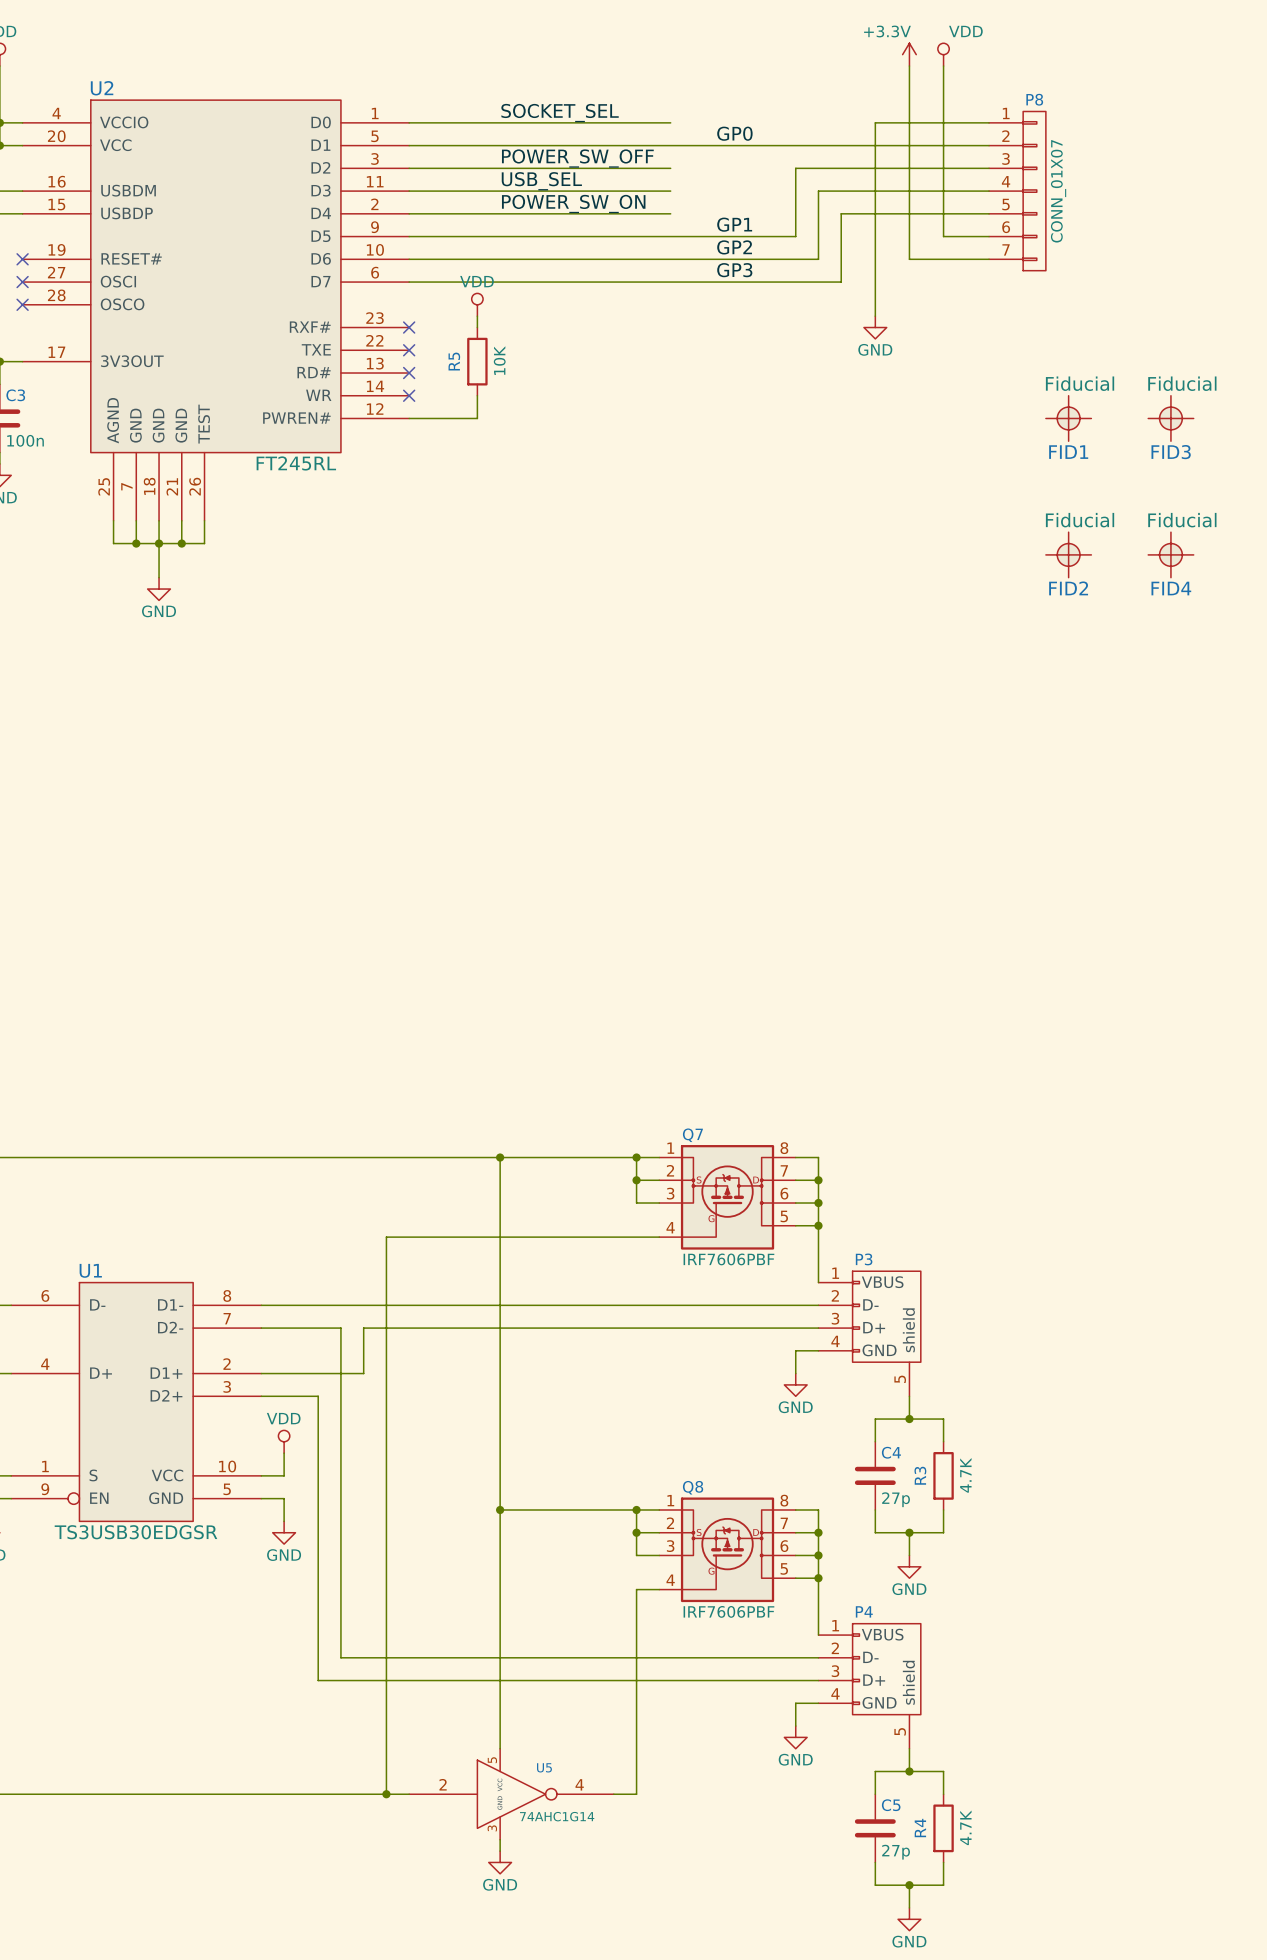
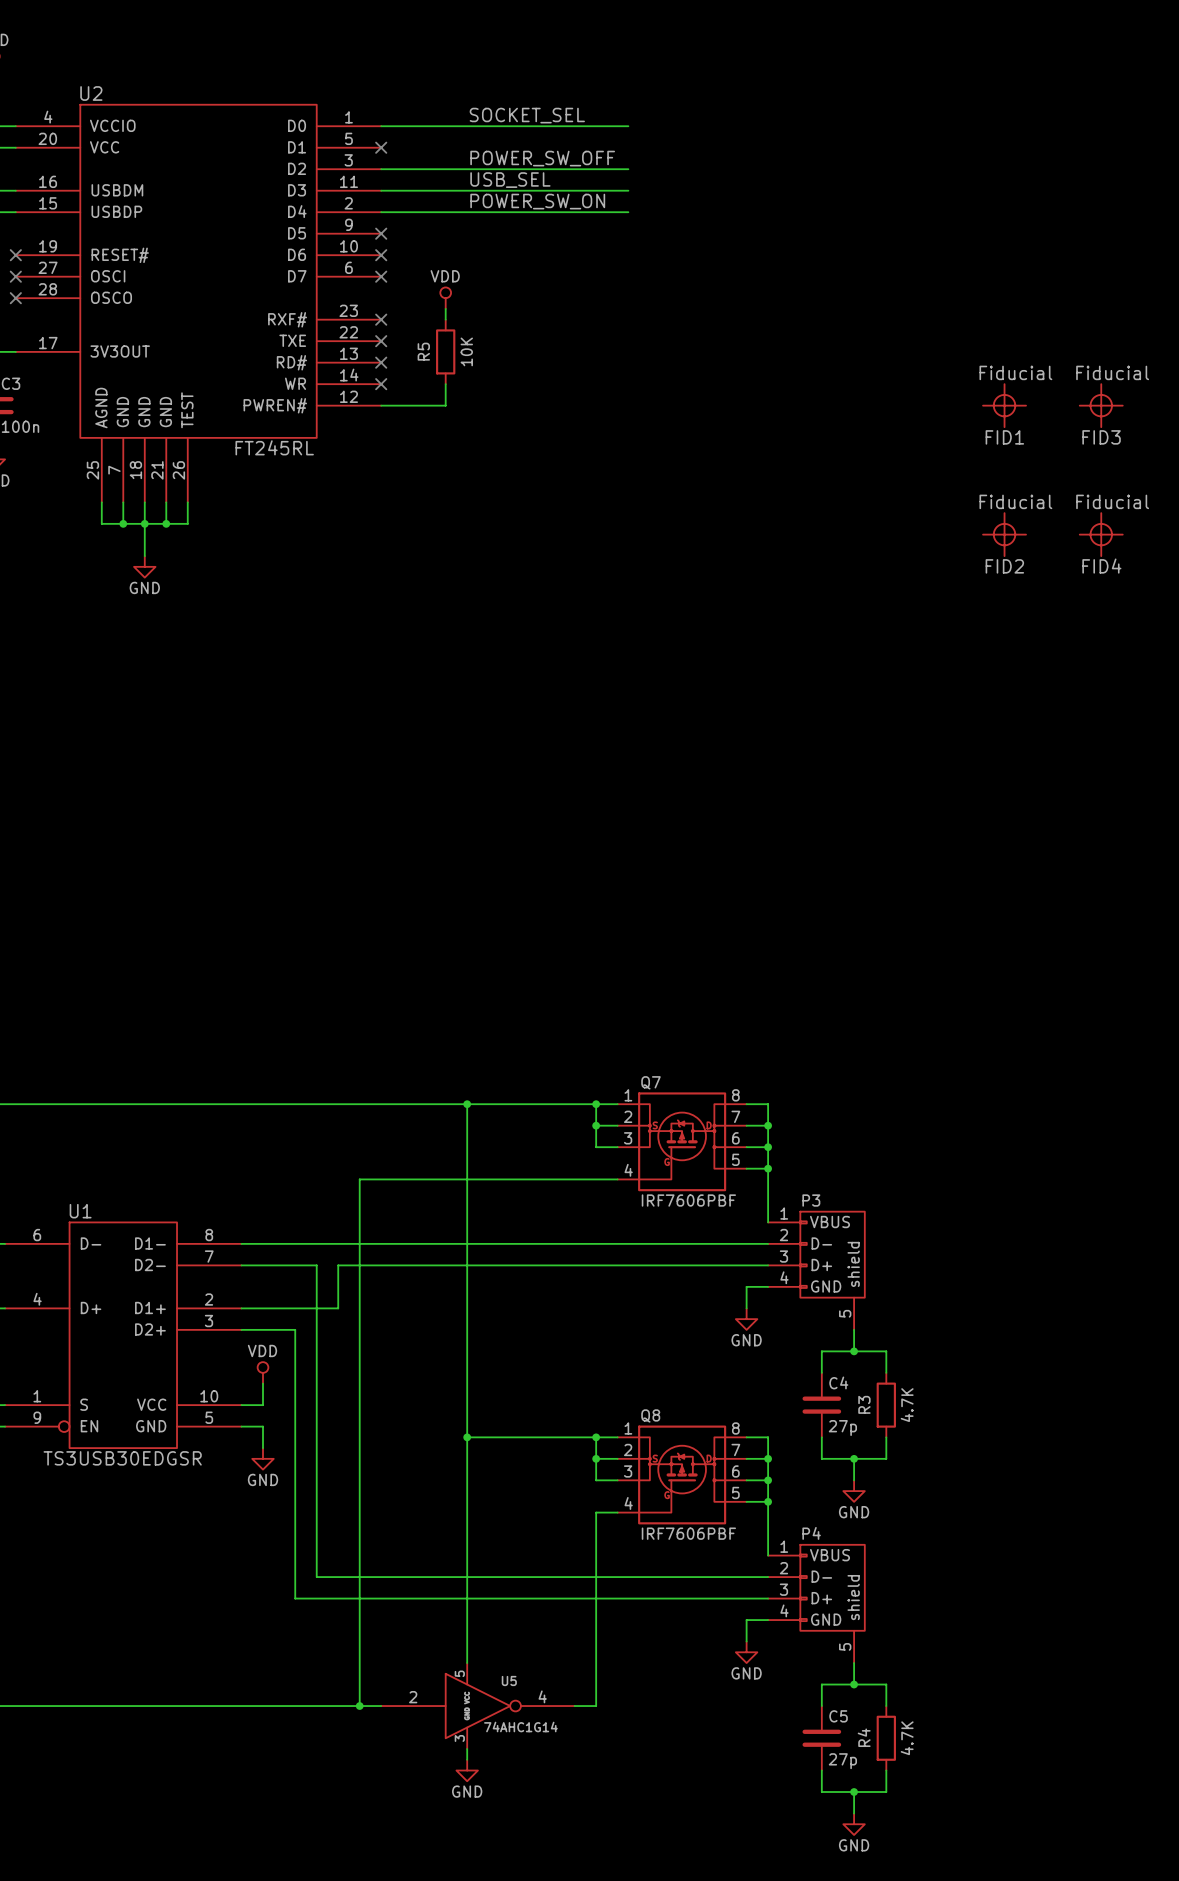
power symbol: +3.3V (909, 54) -> none
power symbol: VDD (943, 54) -> none
wire: (909, 66) (909, 259) (989, 259) -> none
wire: (943, 66) (943, 236) (989, 236) -> none
wire: (989, 122) (875, 122) (875, 316) -> none
label: GP0 (734, 133) -> none
wire: (409, 145) (989, 145) -> none
no-connect mark: none -> (381, 147)
wire: (989, 168) (795, 168) (795, 236) (409, 236) -> none
wire: (989, 191) (818, 191) (818, 259) (409, 259) -> none
P8: CONN_01X07 (1017, 191) -> none
wire: (989, 213) (841, 213) (841, 282) (409, 282) -> none
label: GP1 (734, 224) -> none
no-connect mark: none -> (381, 233)
label: GP2 (734, 247) -> none
no-connect mark: none -> (381, 255)
label: GP3 (734, 270) -> none
no-connect mark: none -> (381, 276)
power symbol: GND (875, 327) -> none

